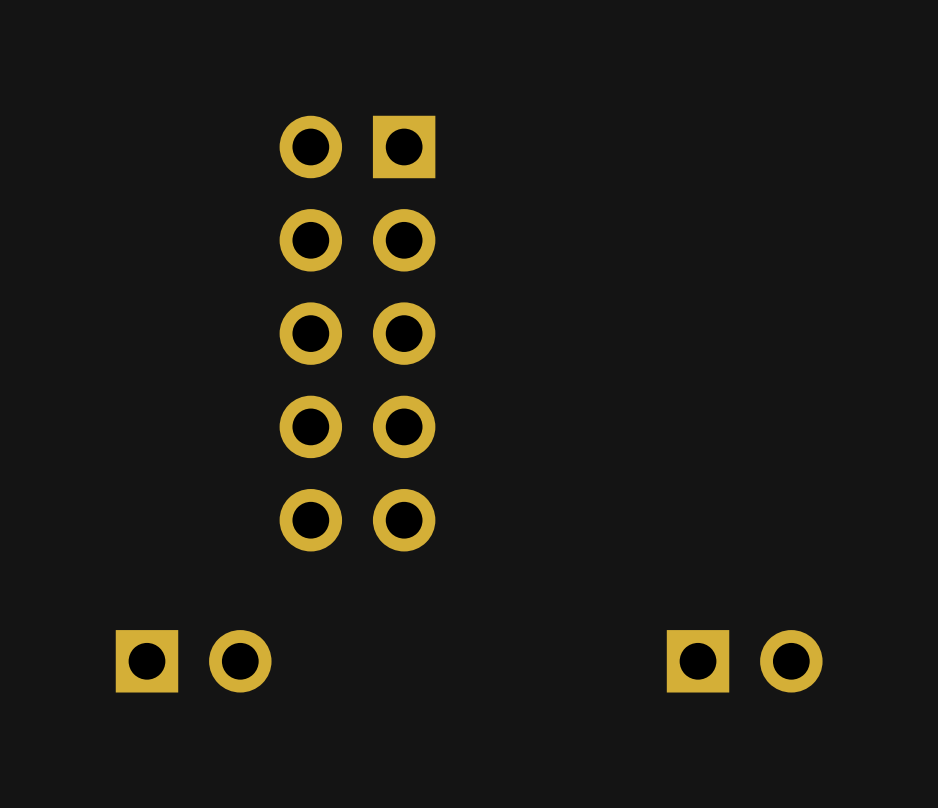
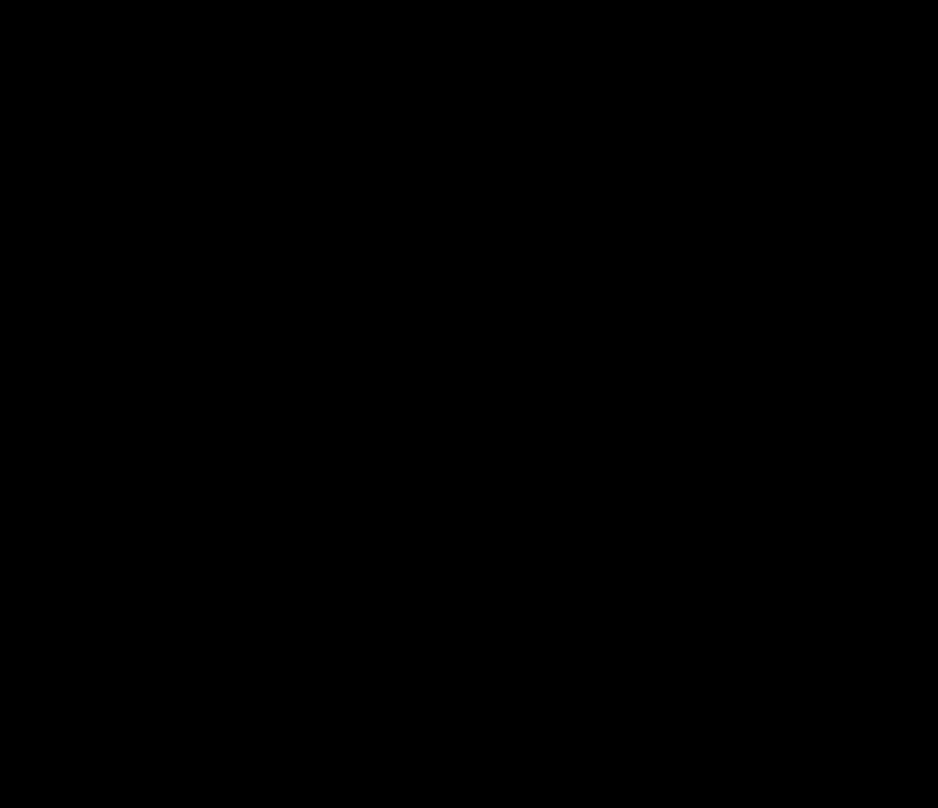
part: (357, 333) -> none
part: (193, 661) -> none
part: (744, 661) -> none

